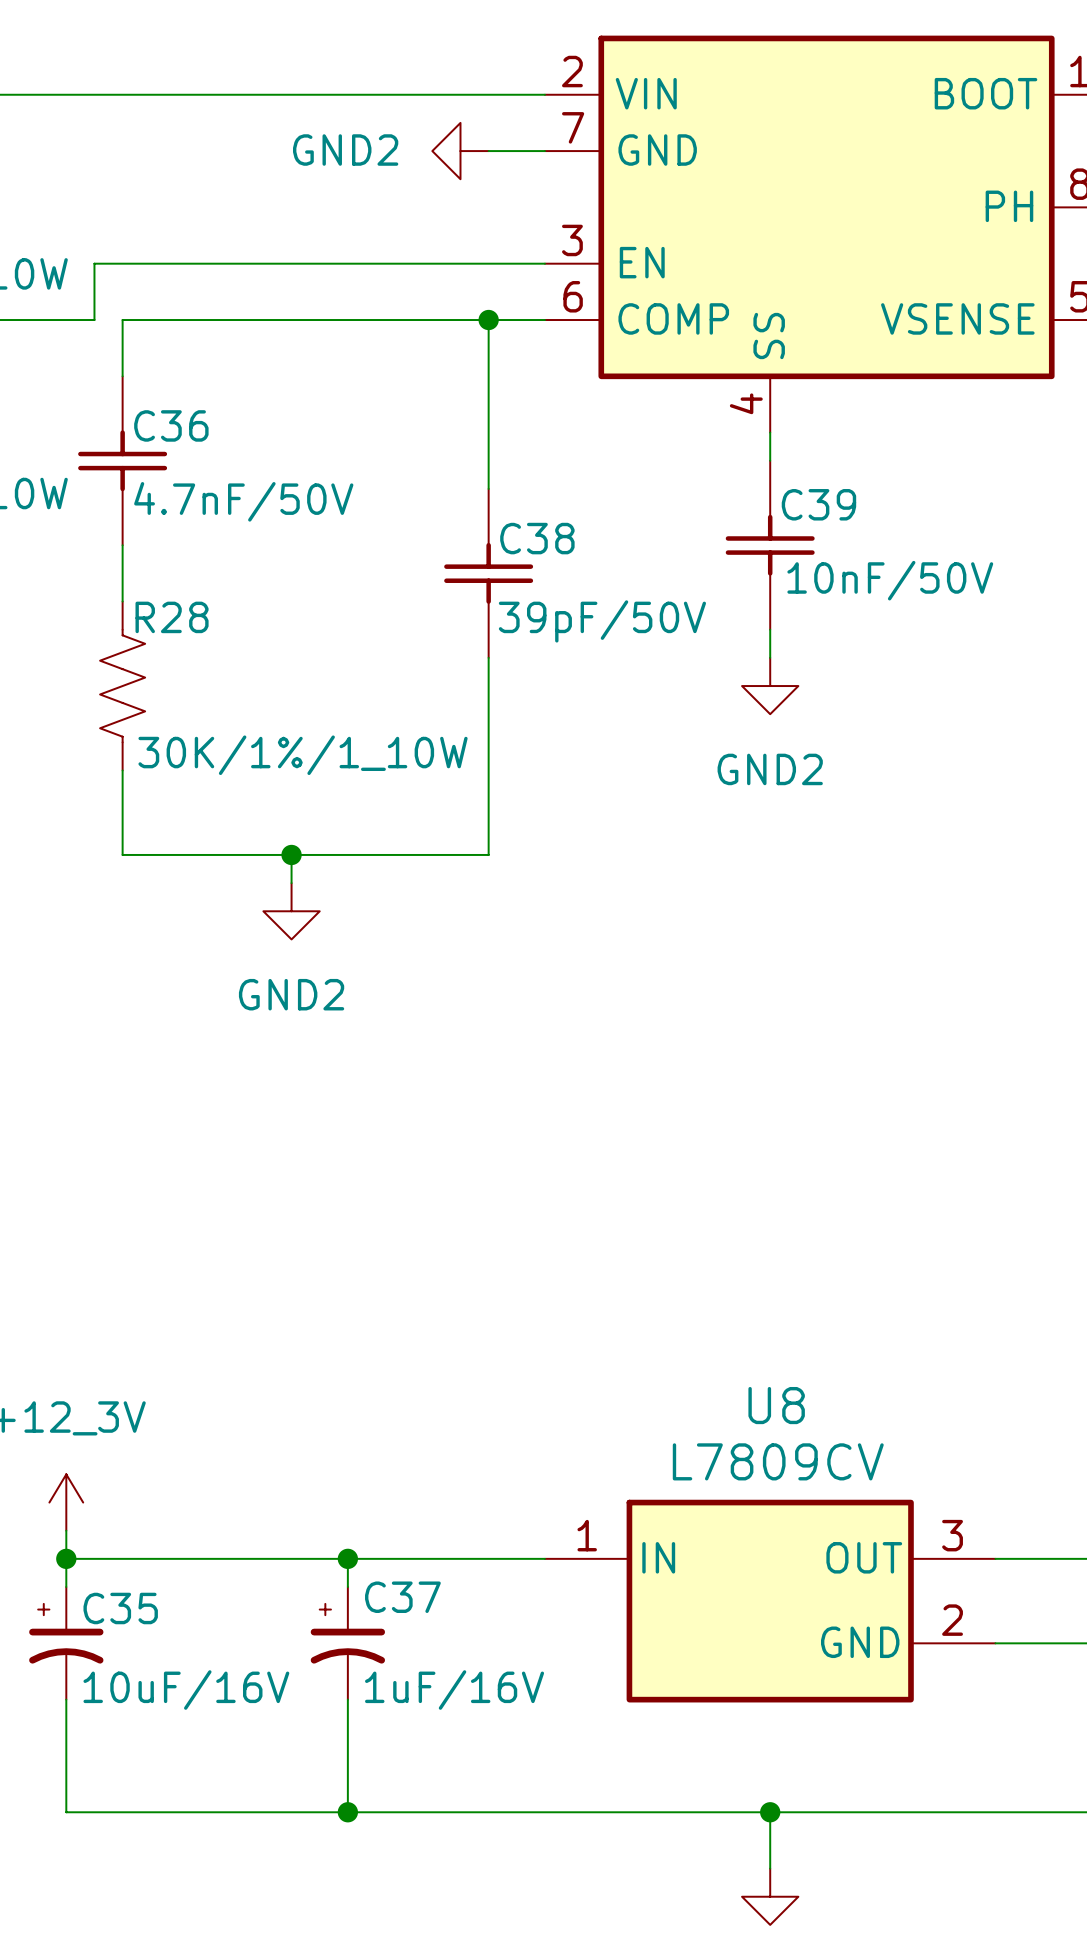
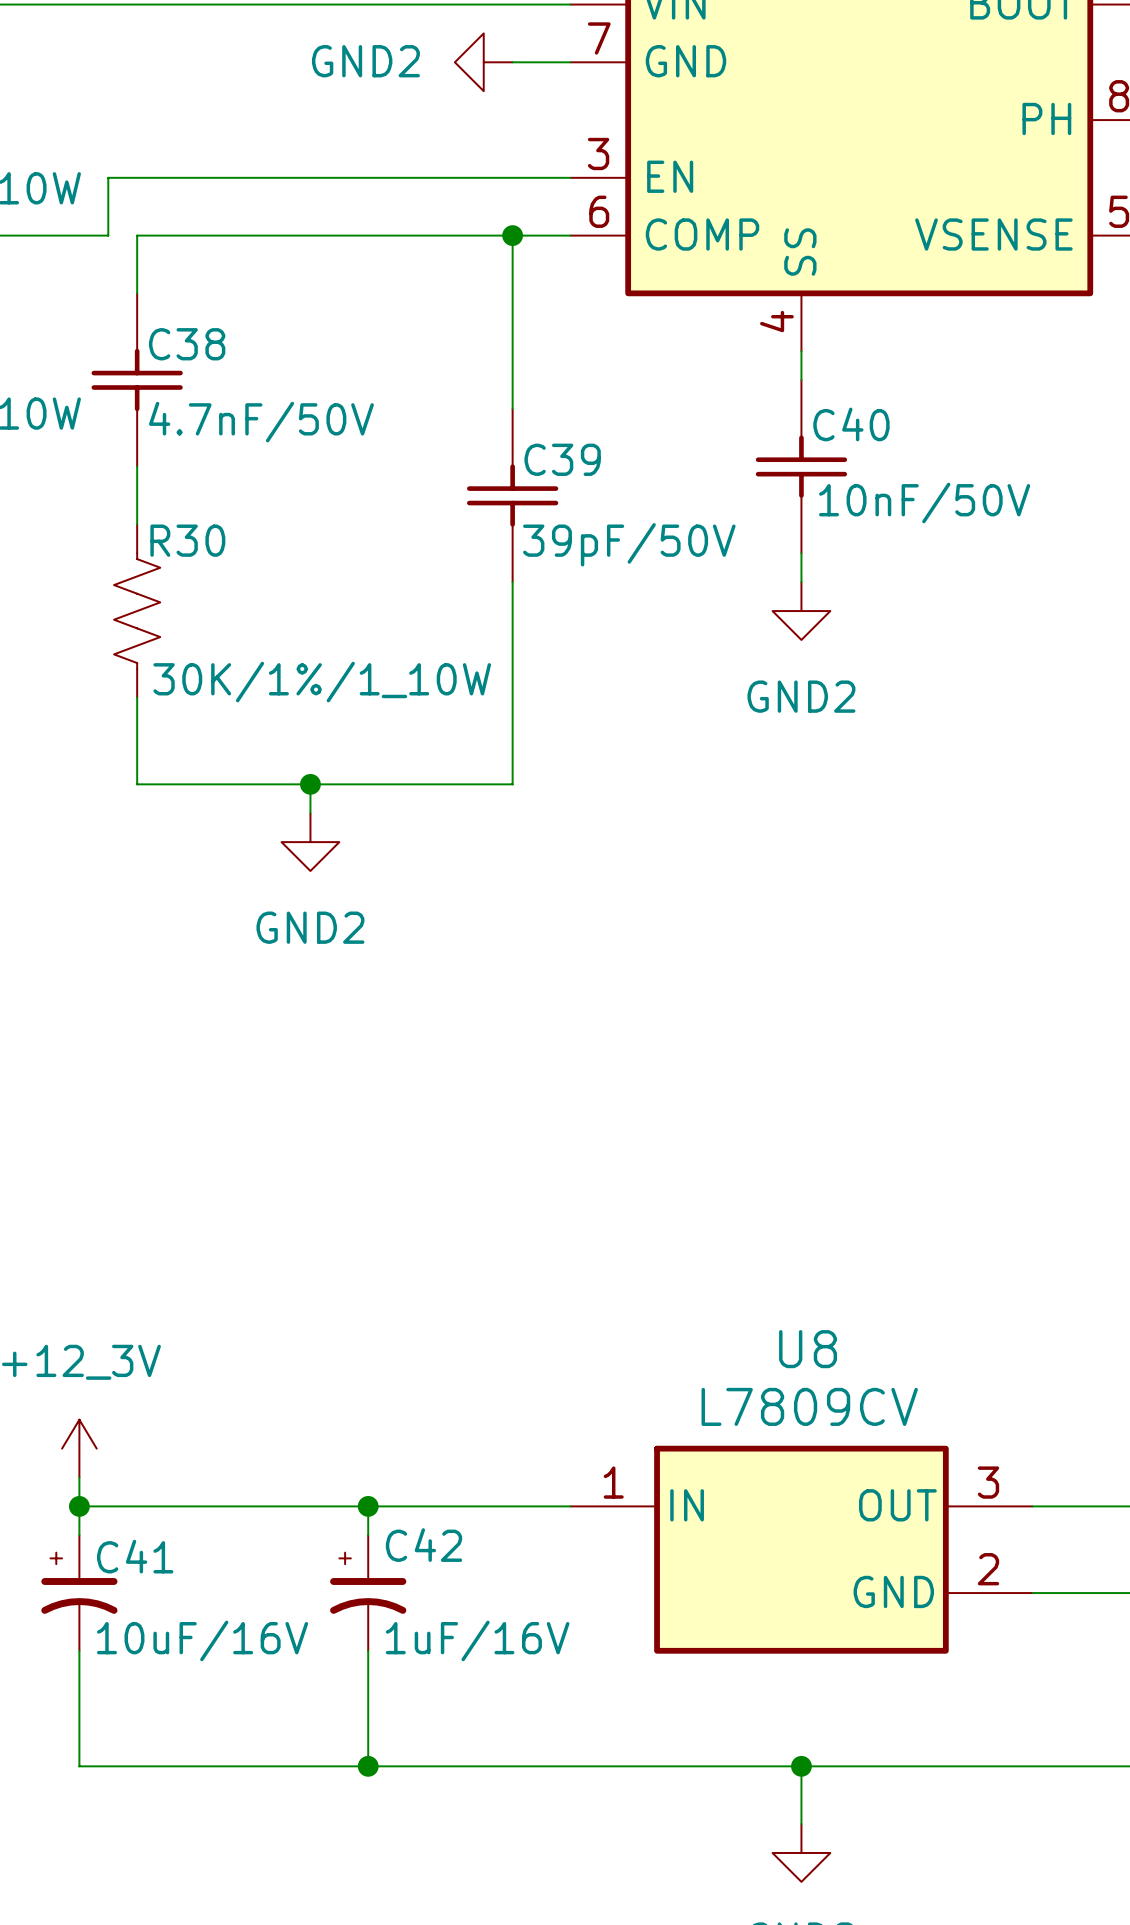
C36 name: C36 (171, 425) -> C38 (187, 344)
C39 name: C39 (818, 504) -> C40 (851, 424)
C38 name: C38 (537, 538) -> C39 (562, 459)
R28 name: R28 (172, 617) -> R30 (187, 540)
C37 name: C37 (402, 1597) -> C42 (423, 1545)
C35 name: C35 (120, 1608) -> C41 (135, 1556)

